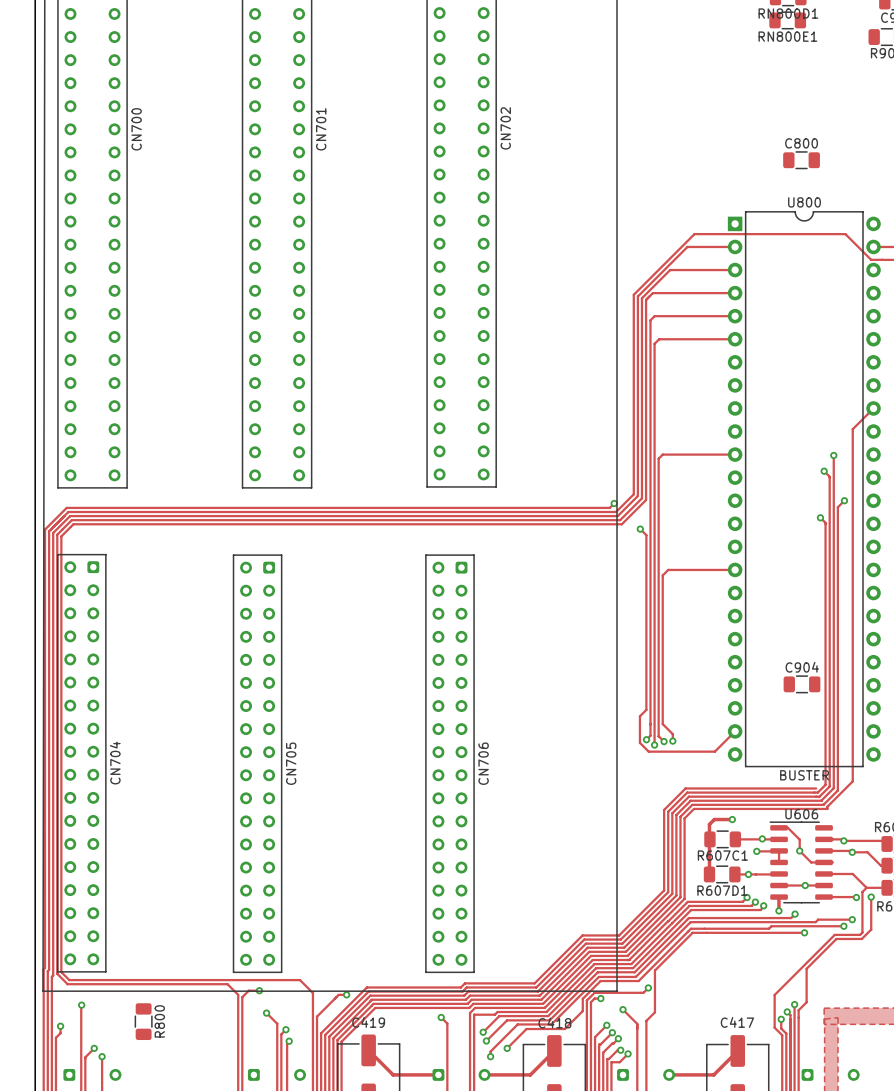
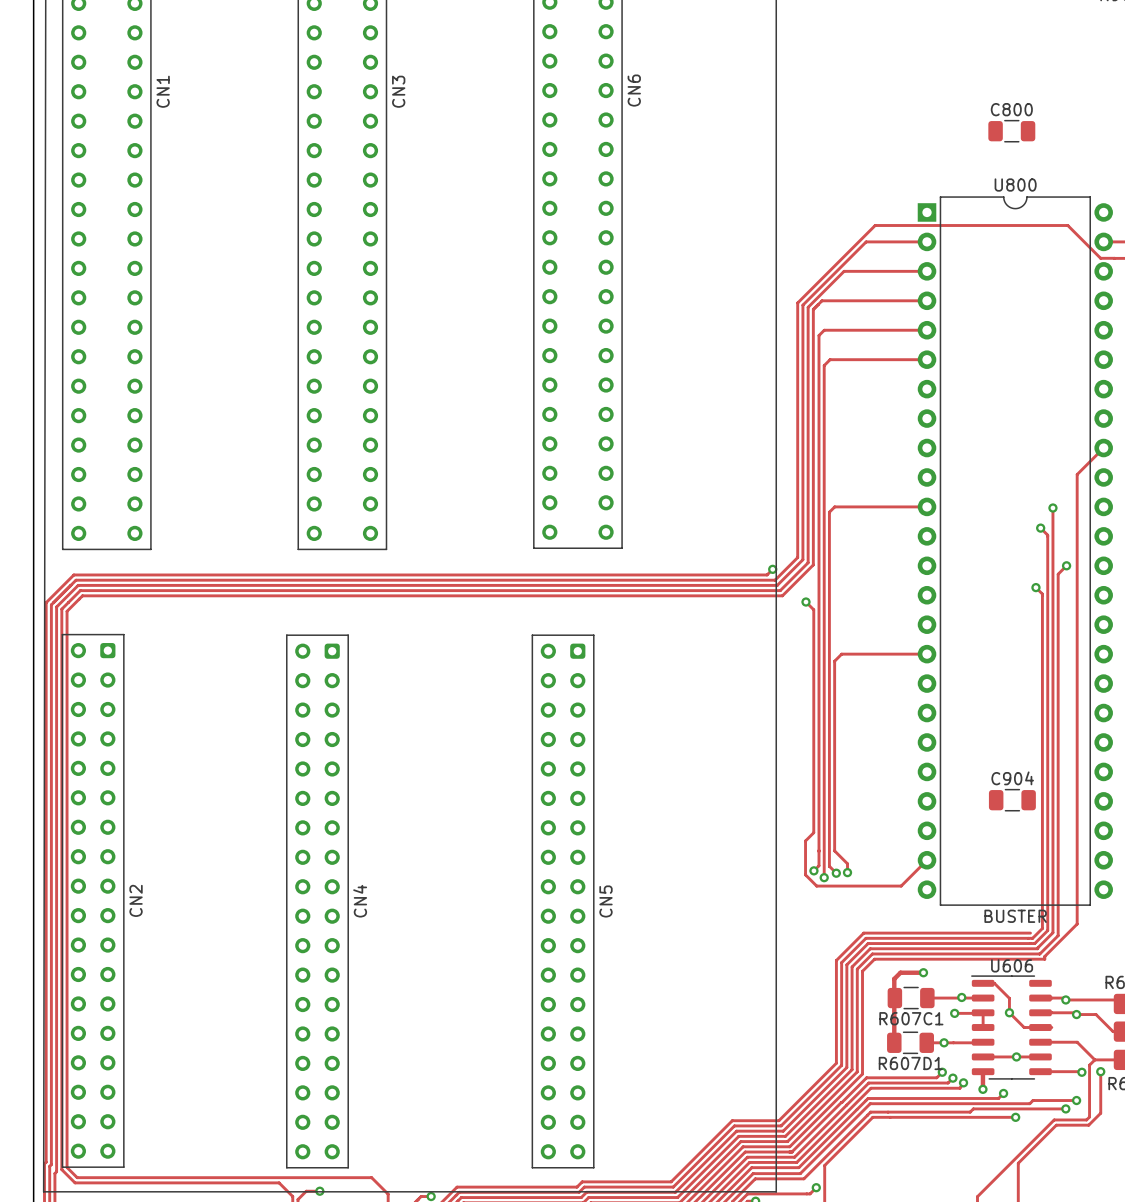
CN702 name: CN702 (505, 128) -> CN6 (634, 90)
CN700 name: CN700 (136, 129) -> CN1 (163, 91)
CN701 name: CN701 (321, 129) -> CN3 (398, 91)
CN704 name: CN704 (115, 763) -> CN2 (136, 900)
CN705 name: CN705 (291, 763) -> CN4 (360, 901)
CN706 name: CN706 (483, 763) -> CN5 (605, 901)

